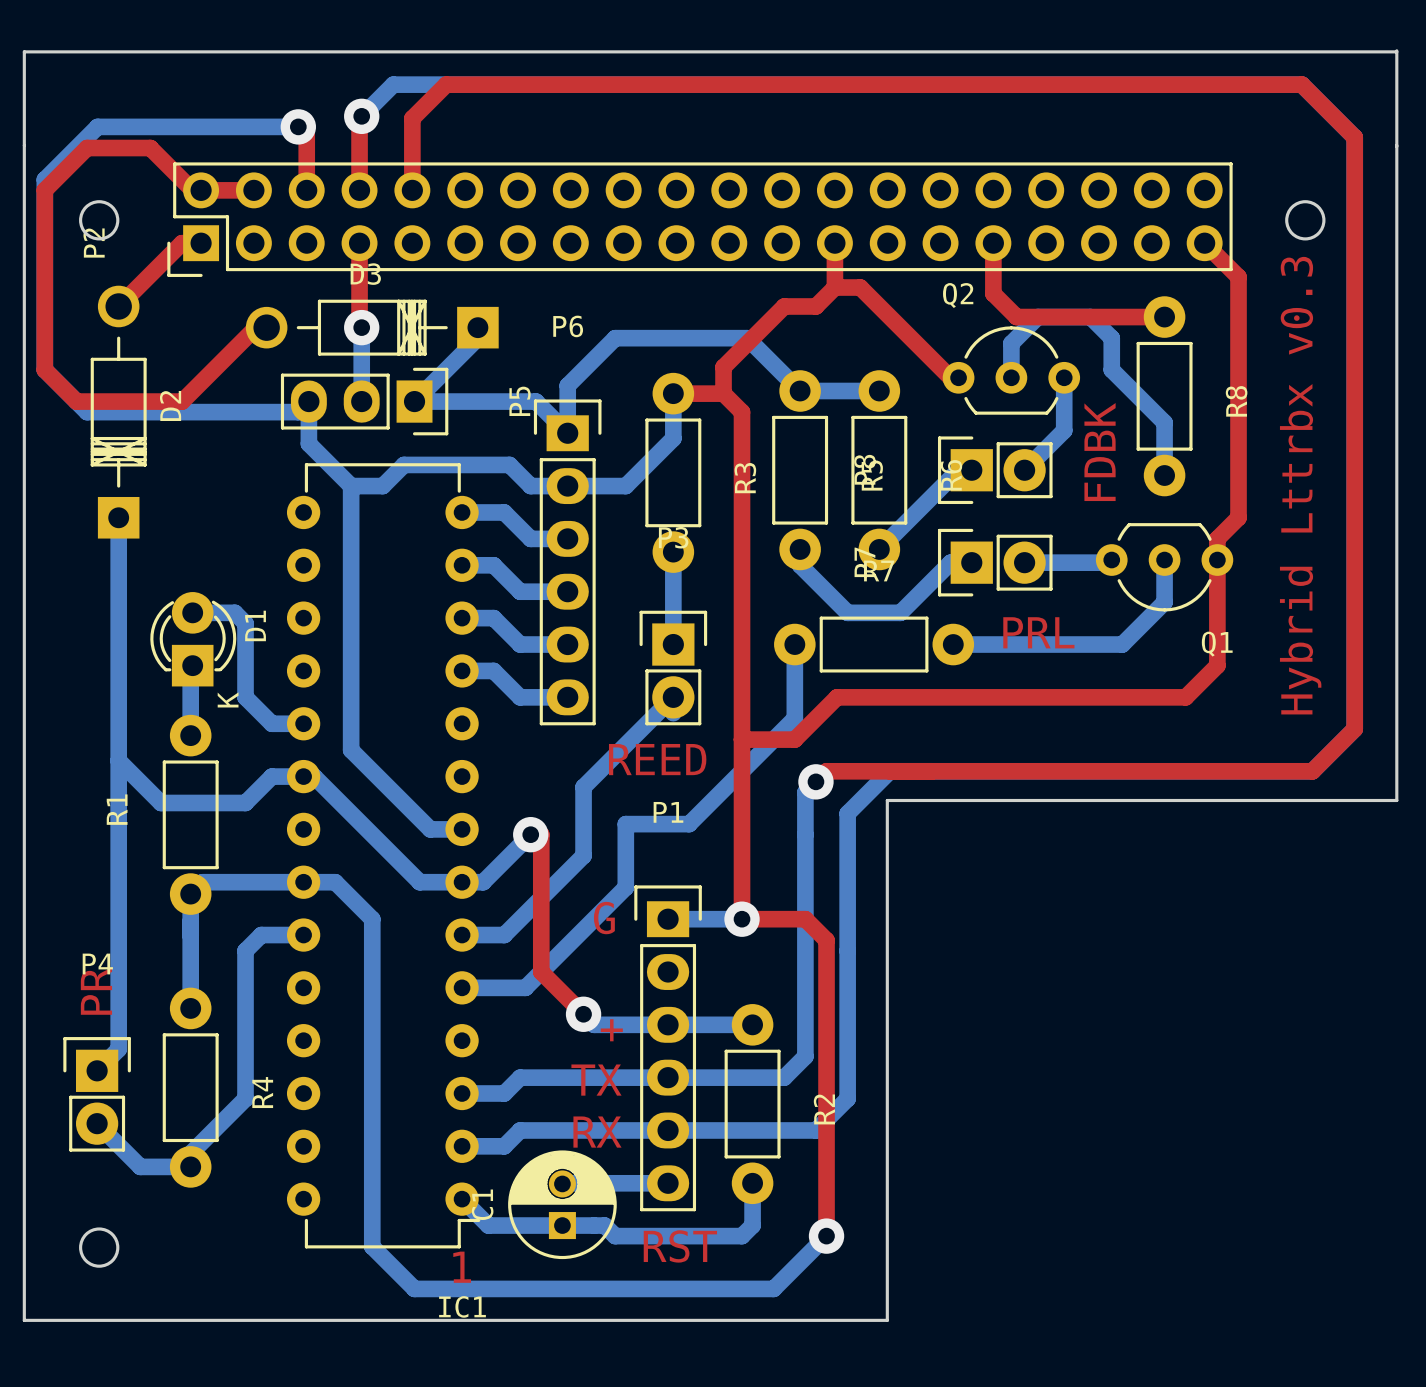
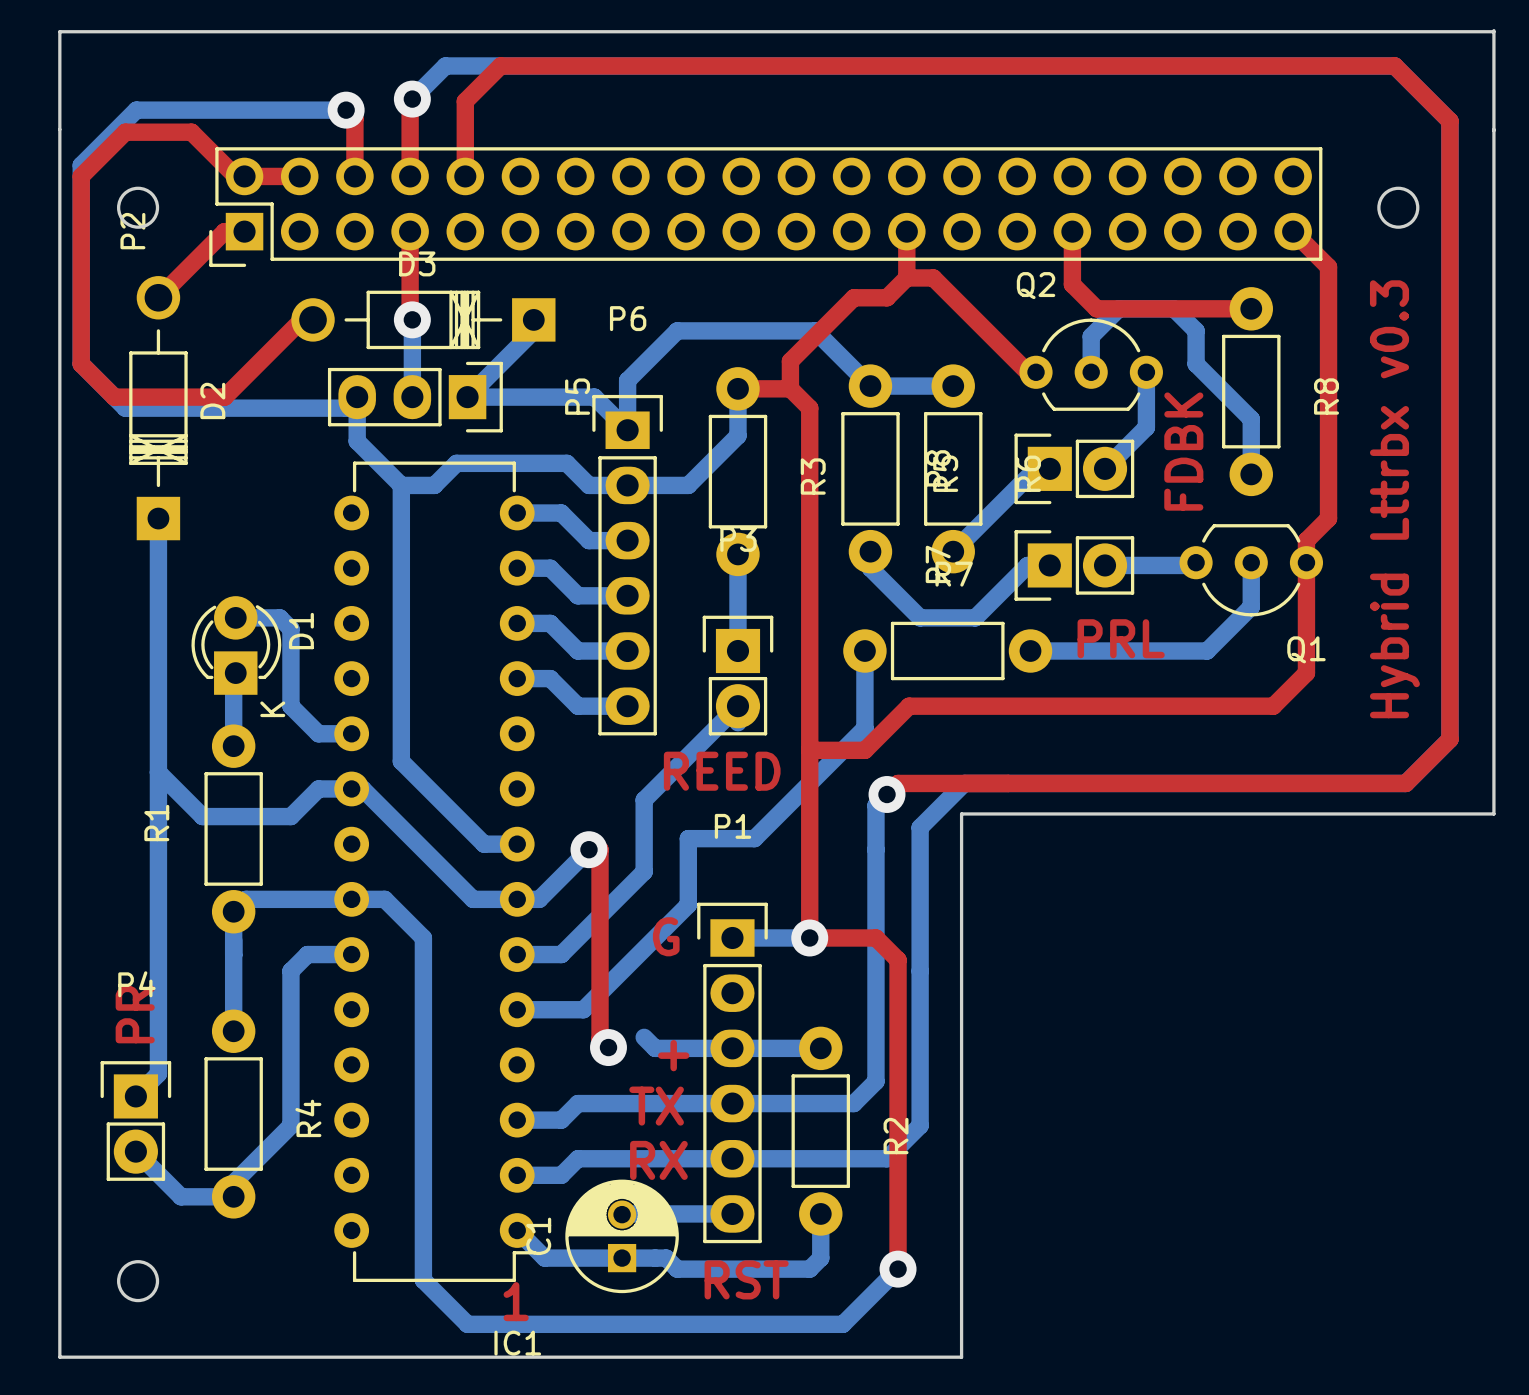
top track: (541, 972) (583, 1014) -> (600, 993) (600, 1039) (608, 1047)
via position: (583, 1014) -> (608, 1047)

